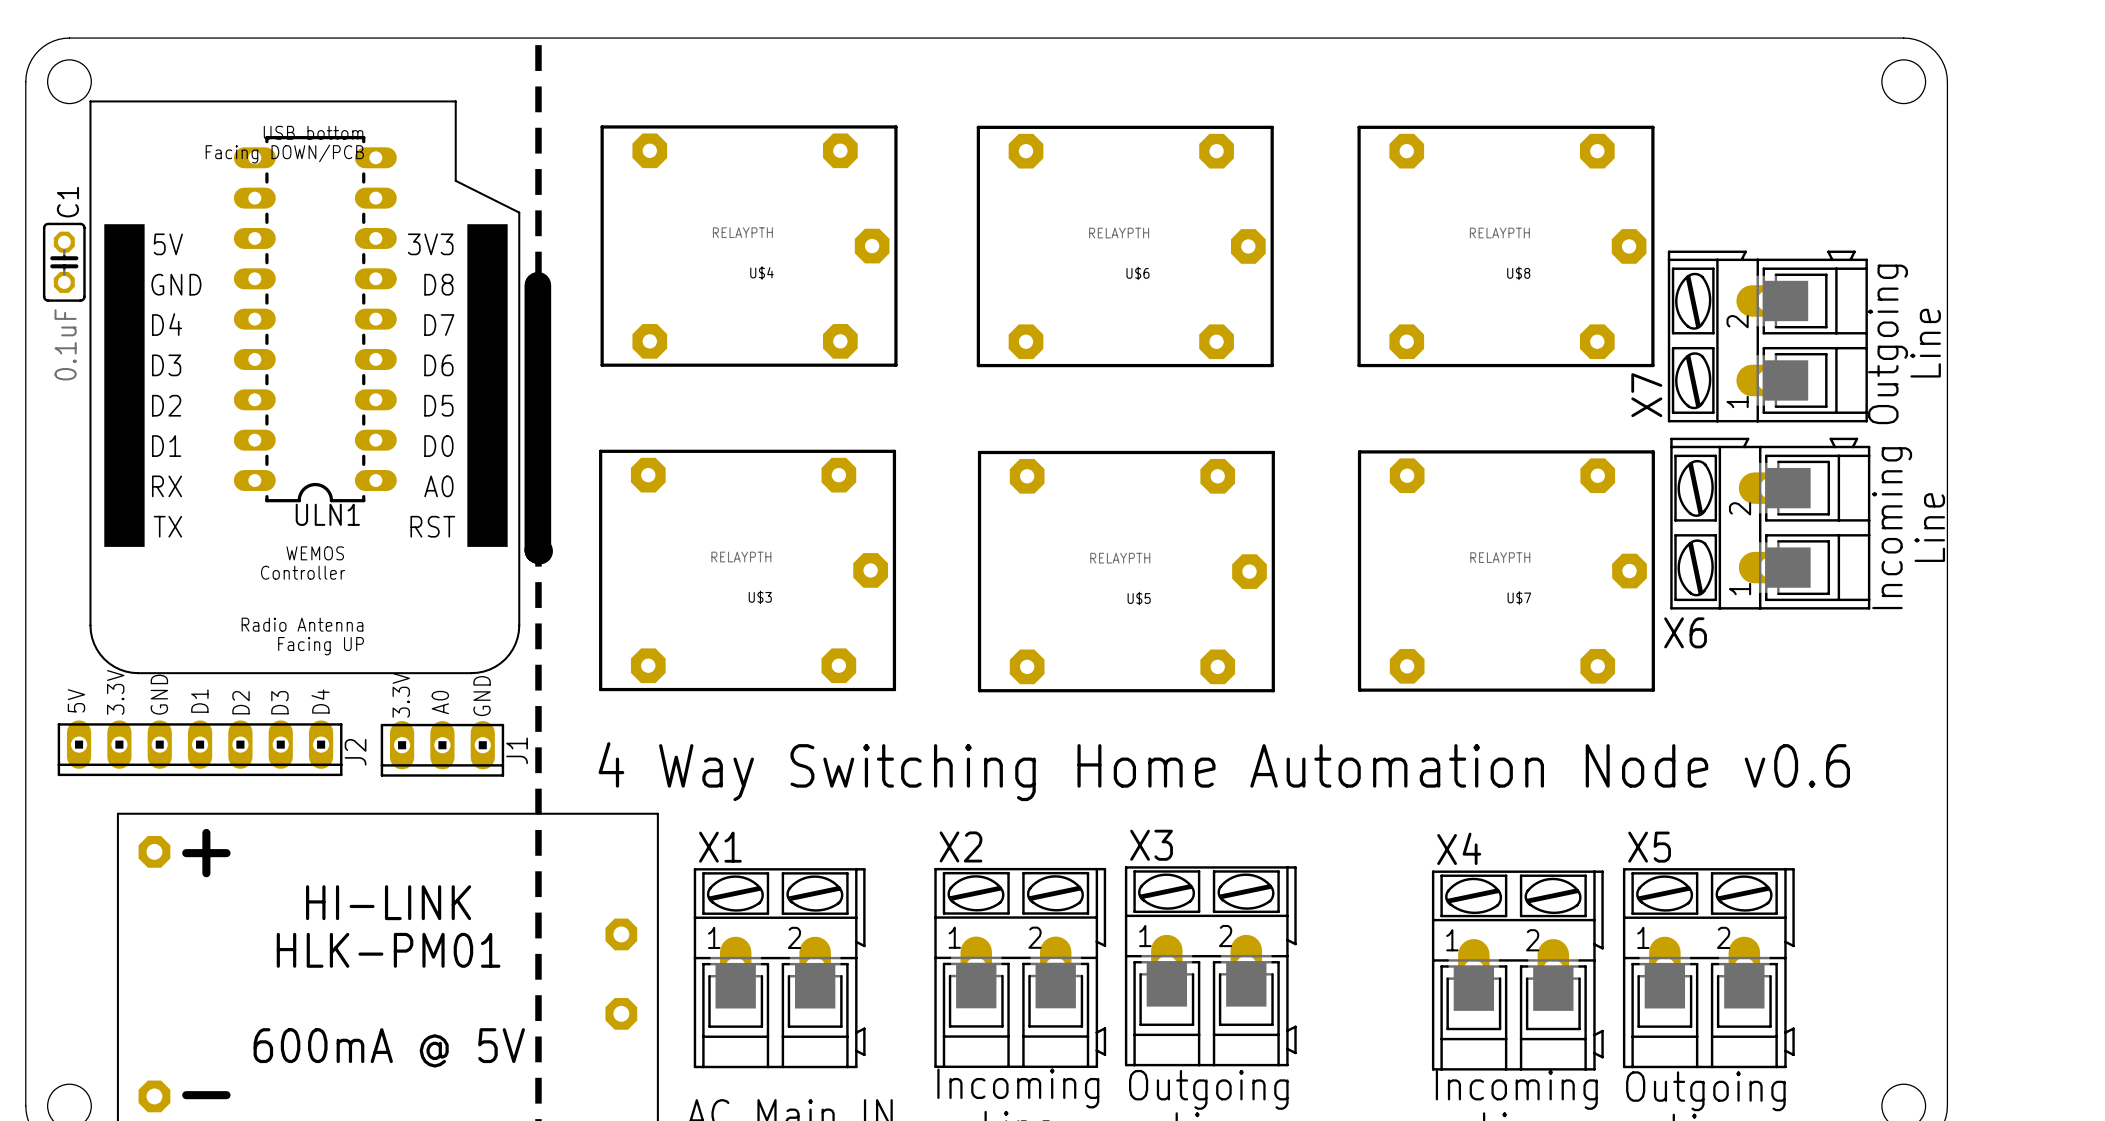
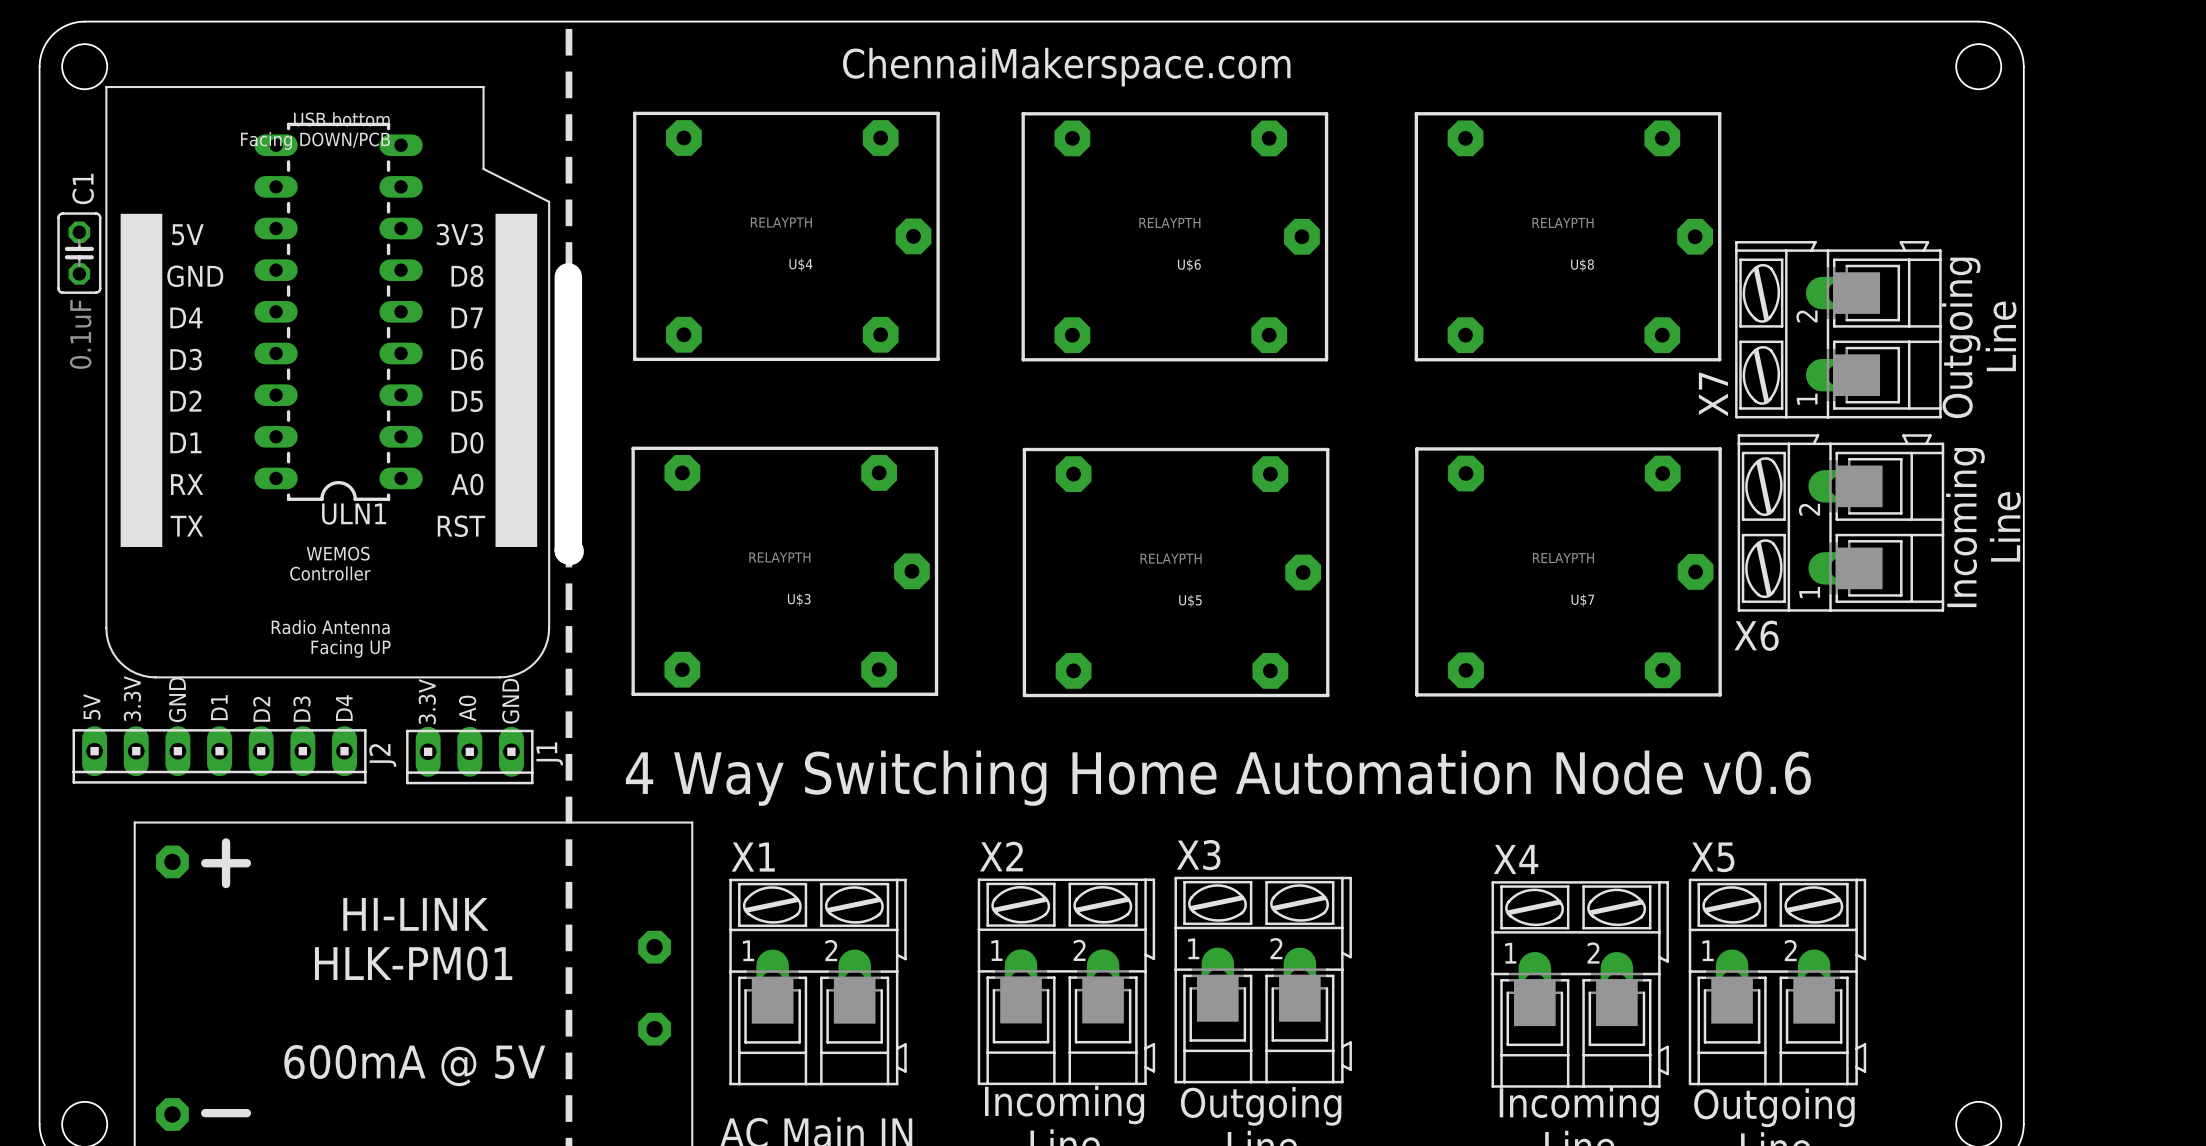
text: none -> ChennaiMakerspace.com (1066, 67)

